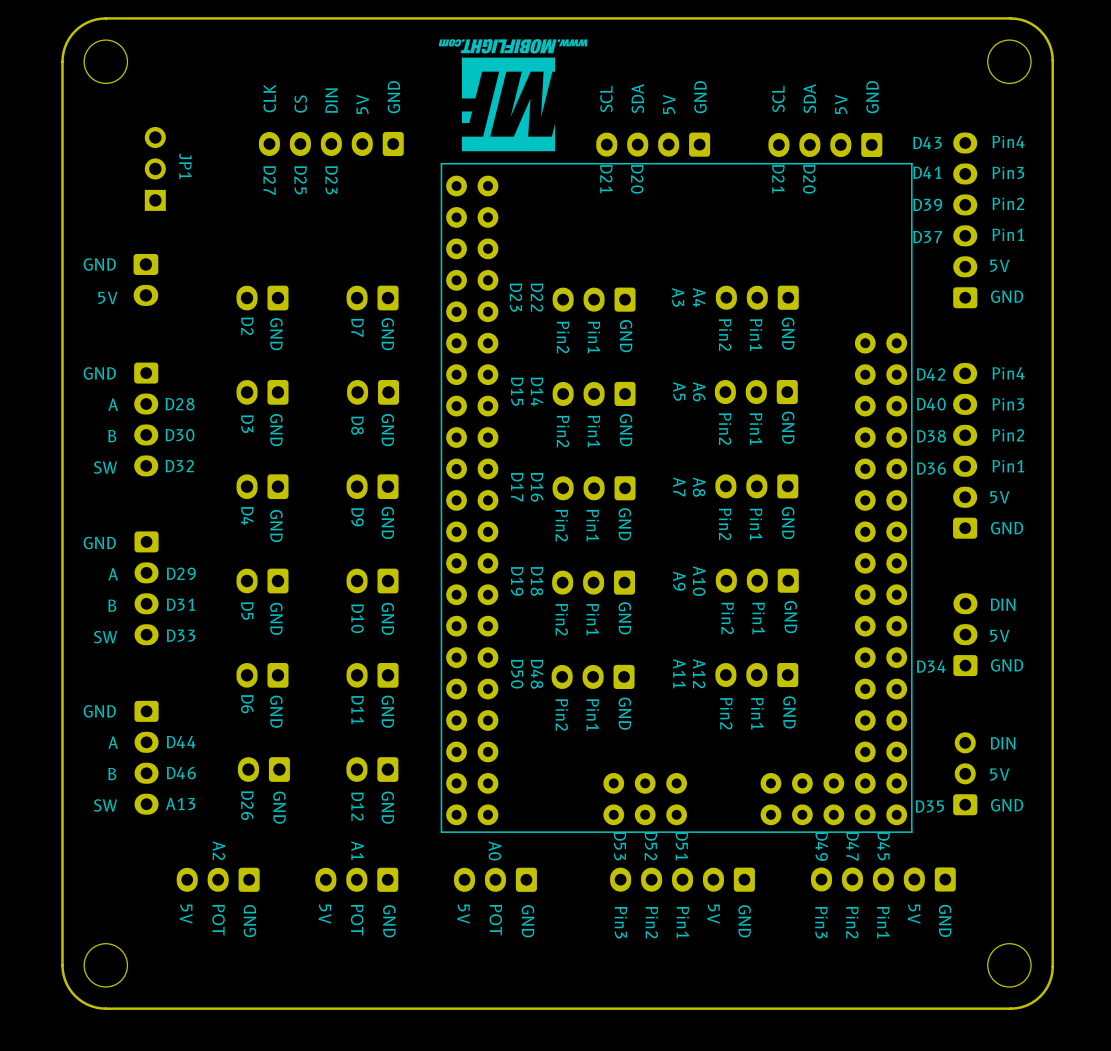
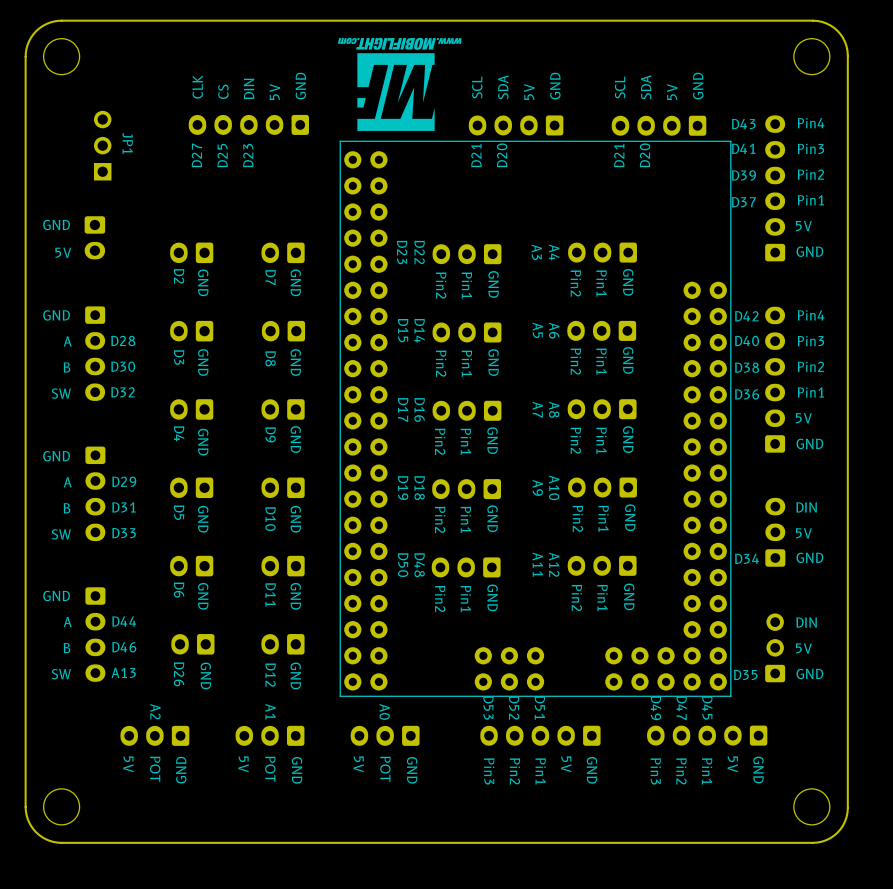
text rotation: 0° (606, 179) -> 180° (476, 155)
text rotation: 0° (637, 179) -> 180° (502, 155)
text rotation: 0° (778, 179) -> 180° (619, 155)
text rotation: 0° (809, 179) -> 180° (645, 155)
text rotation: 0° (269, 180) -> 180° (196, 155)
text rotation: 0° (300, 180) -> 180° (222, 155)
text rotation: 0° (331, 180) -> 180° (248, 155)

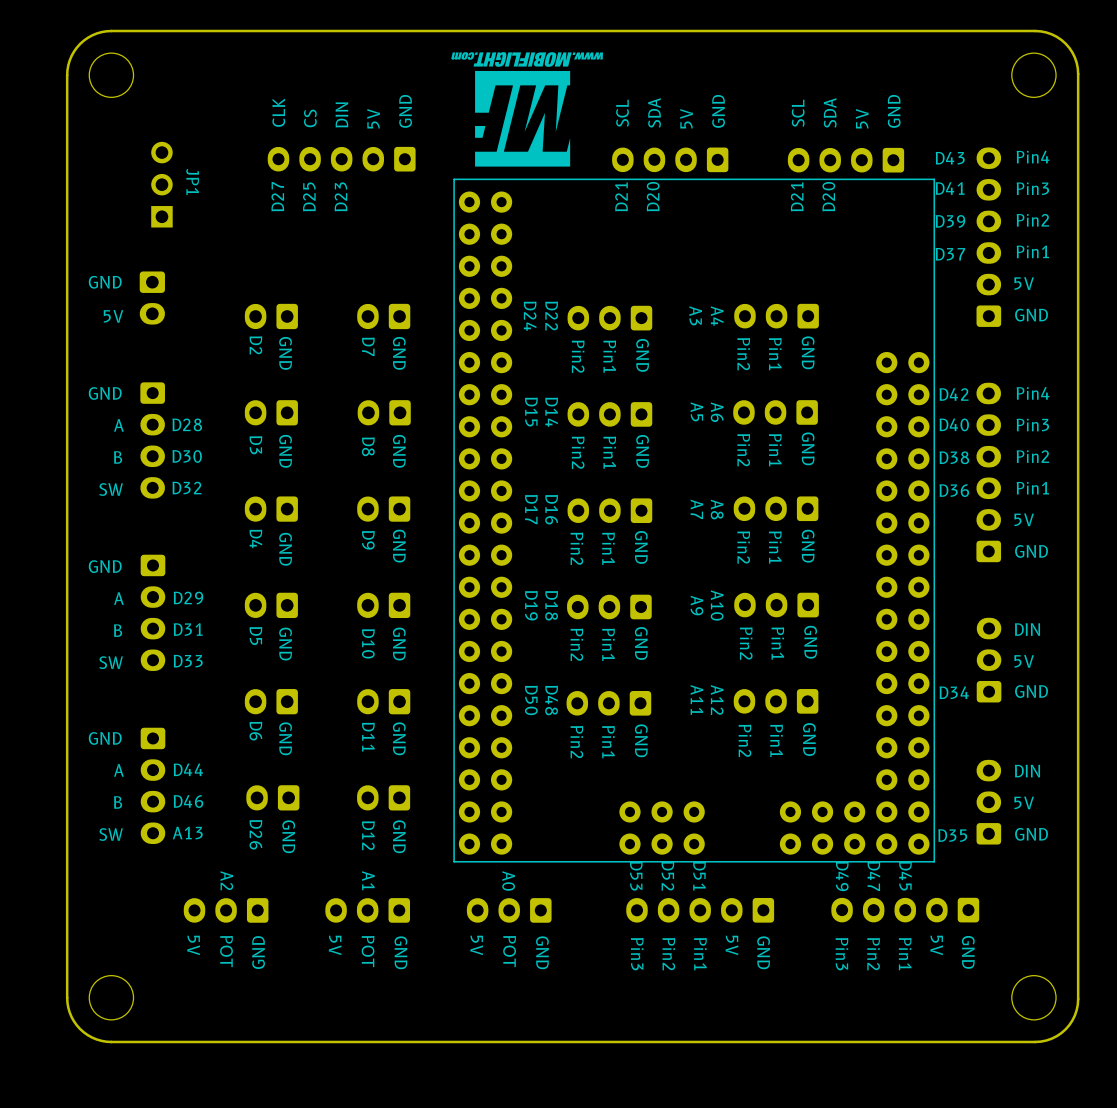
text: D23 (402, 252) -> D24 (530, 316)
part footprint: [765, 613, 786, 683] -> [976, 759, 1002, 845]

